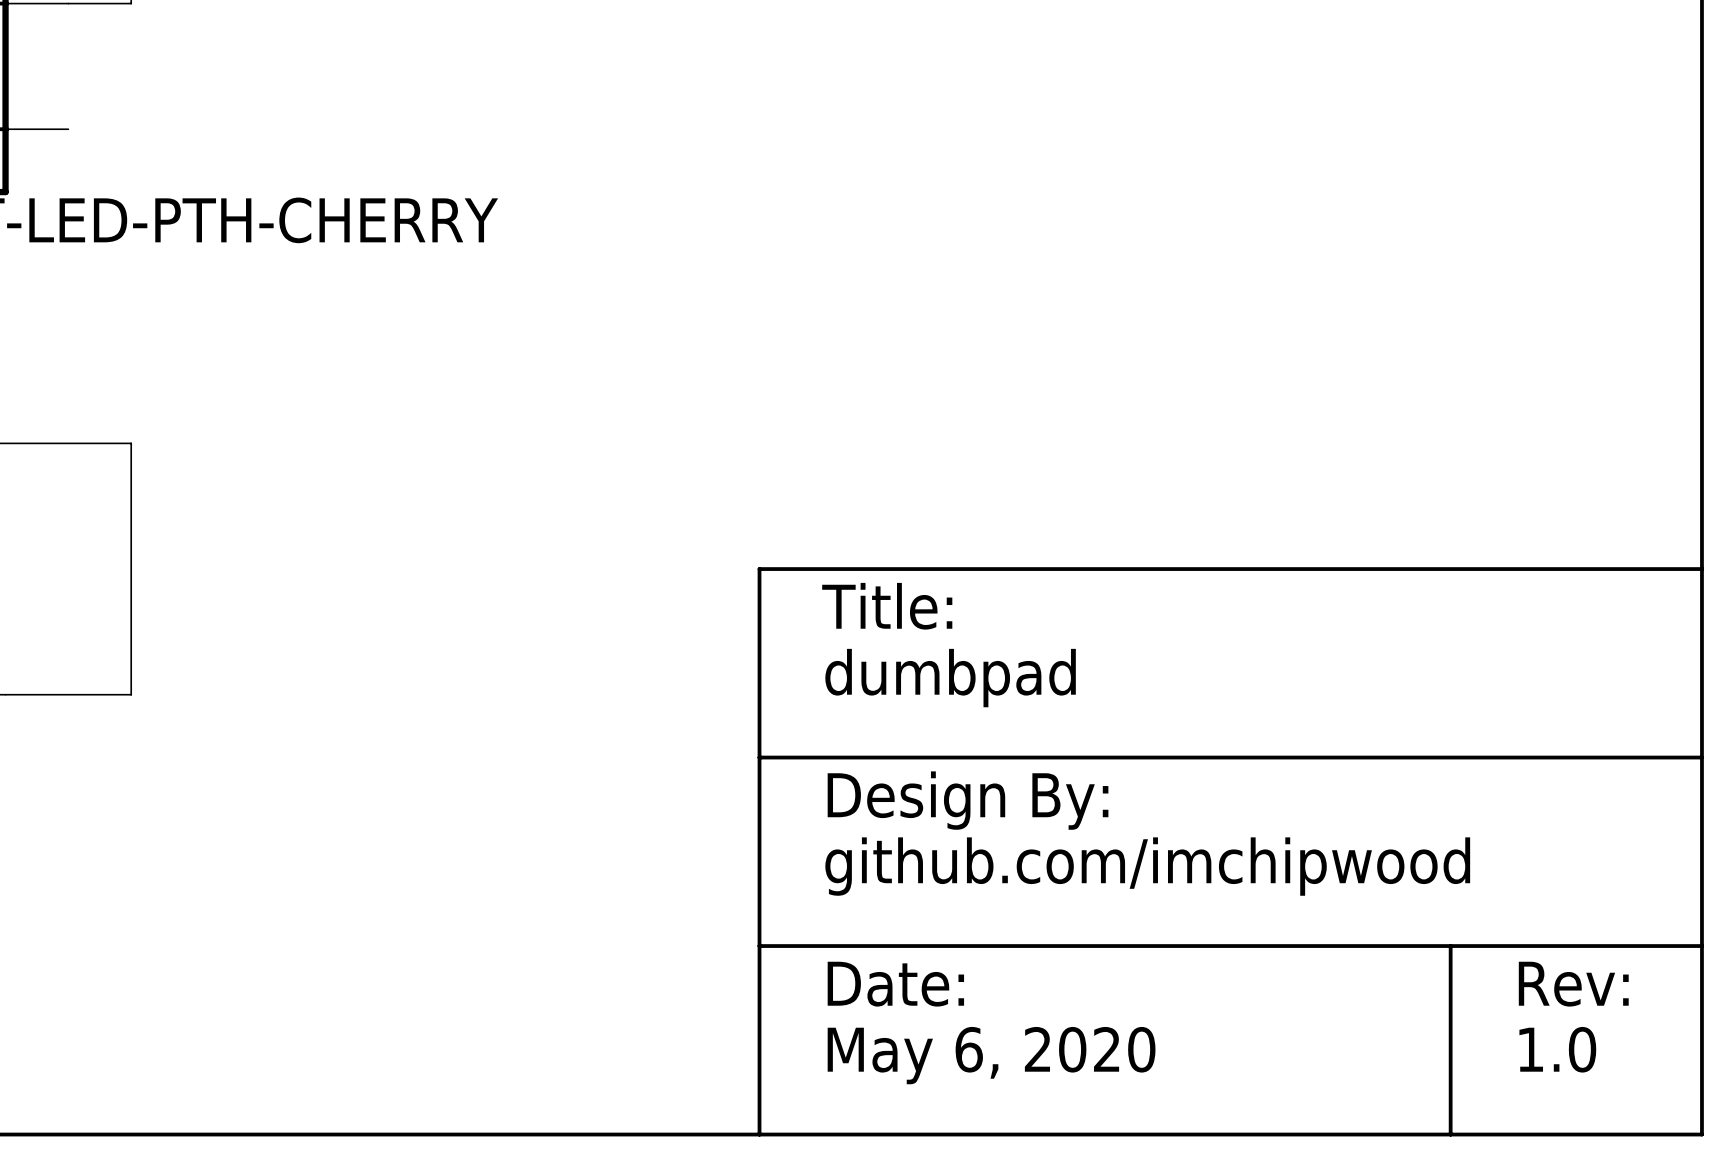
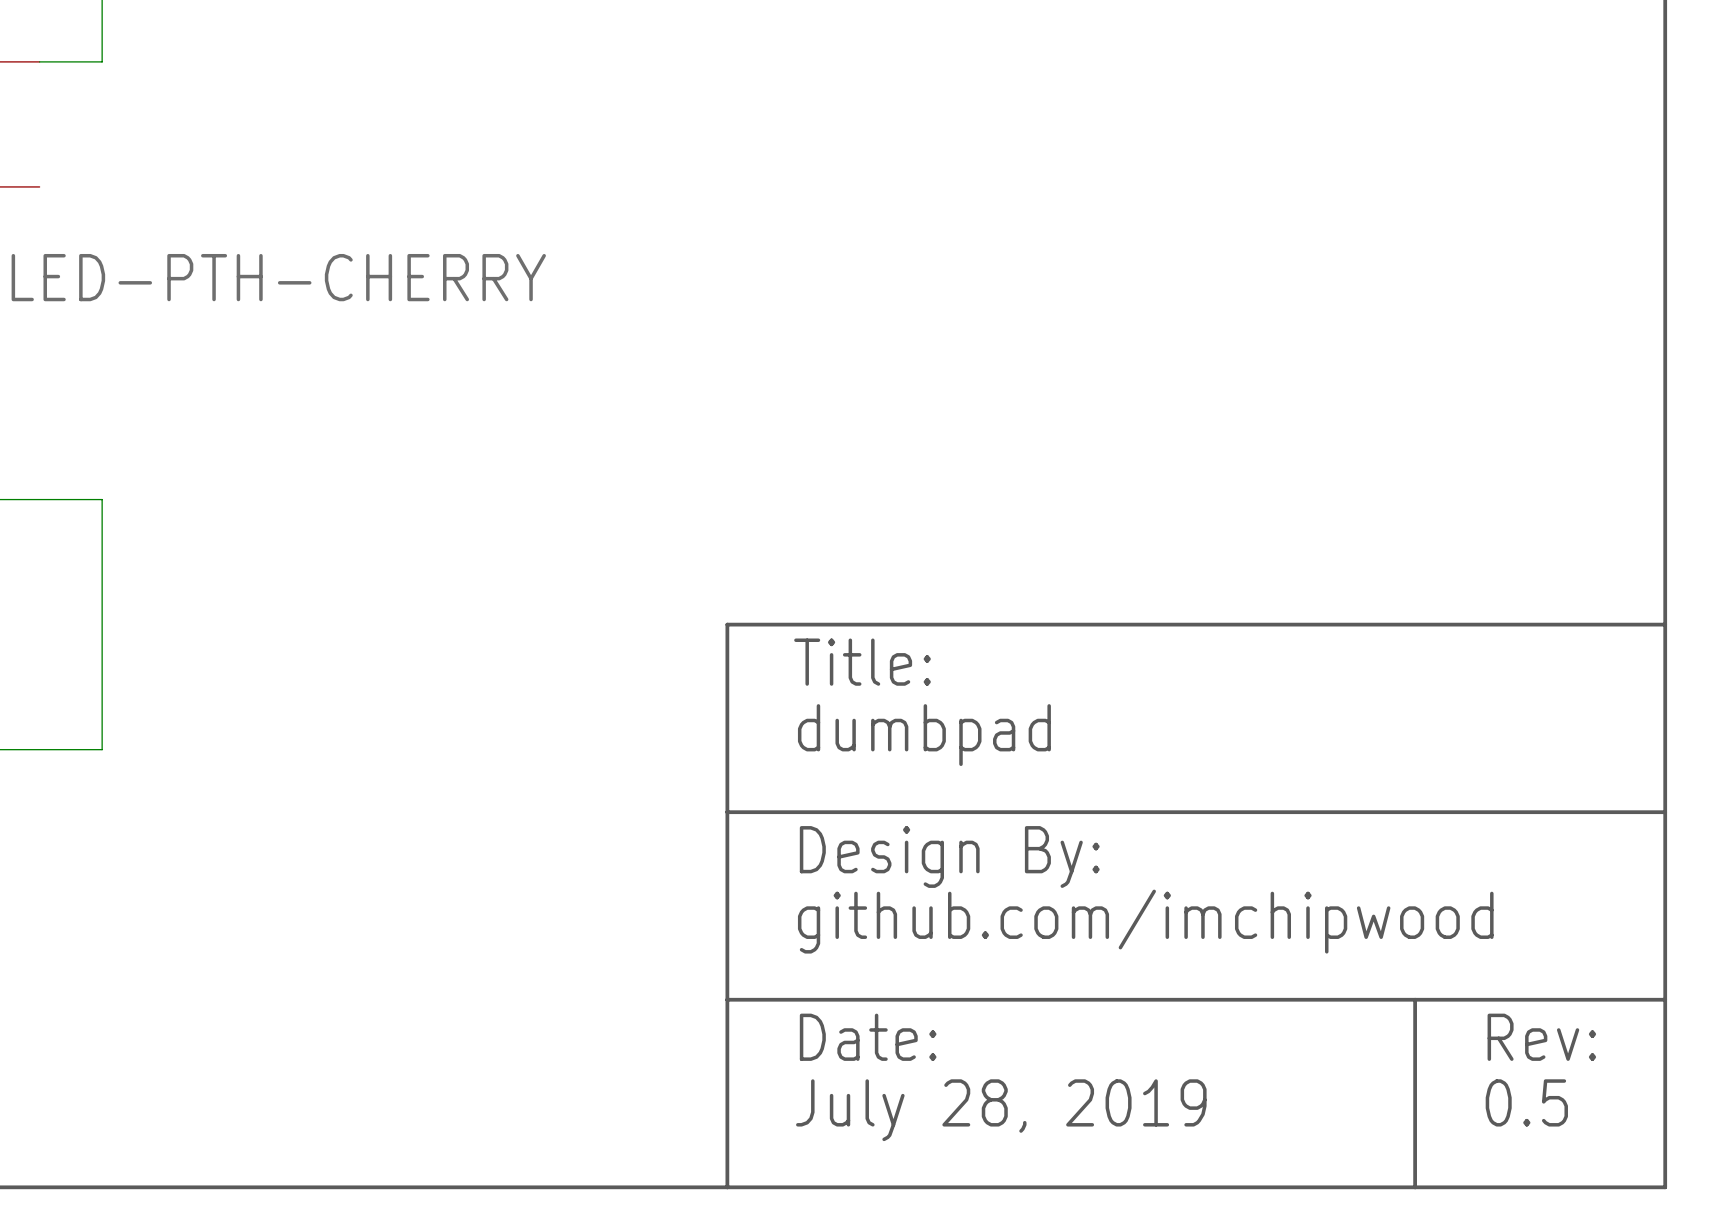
text: 1.0 (1557, 1049) -> 0.5 (1526, 1102)
text: May 6, 2020 (991, 1055) -> July 28, 2019 (1001, 1110)

